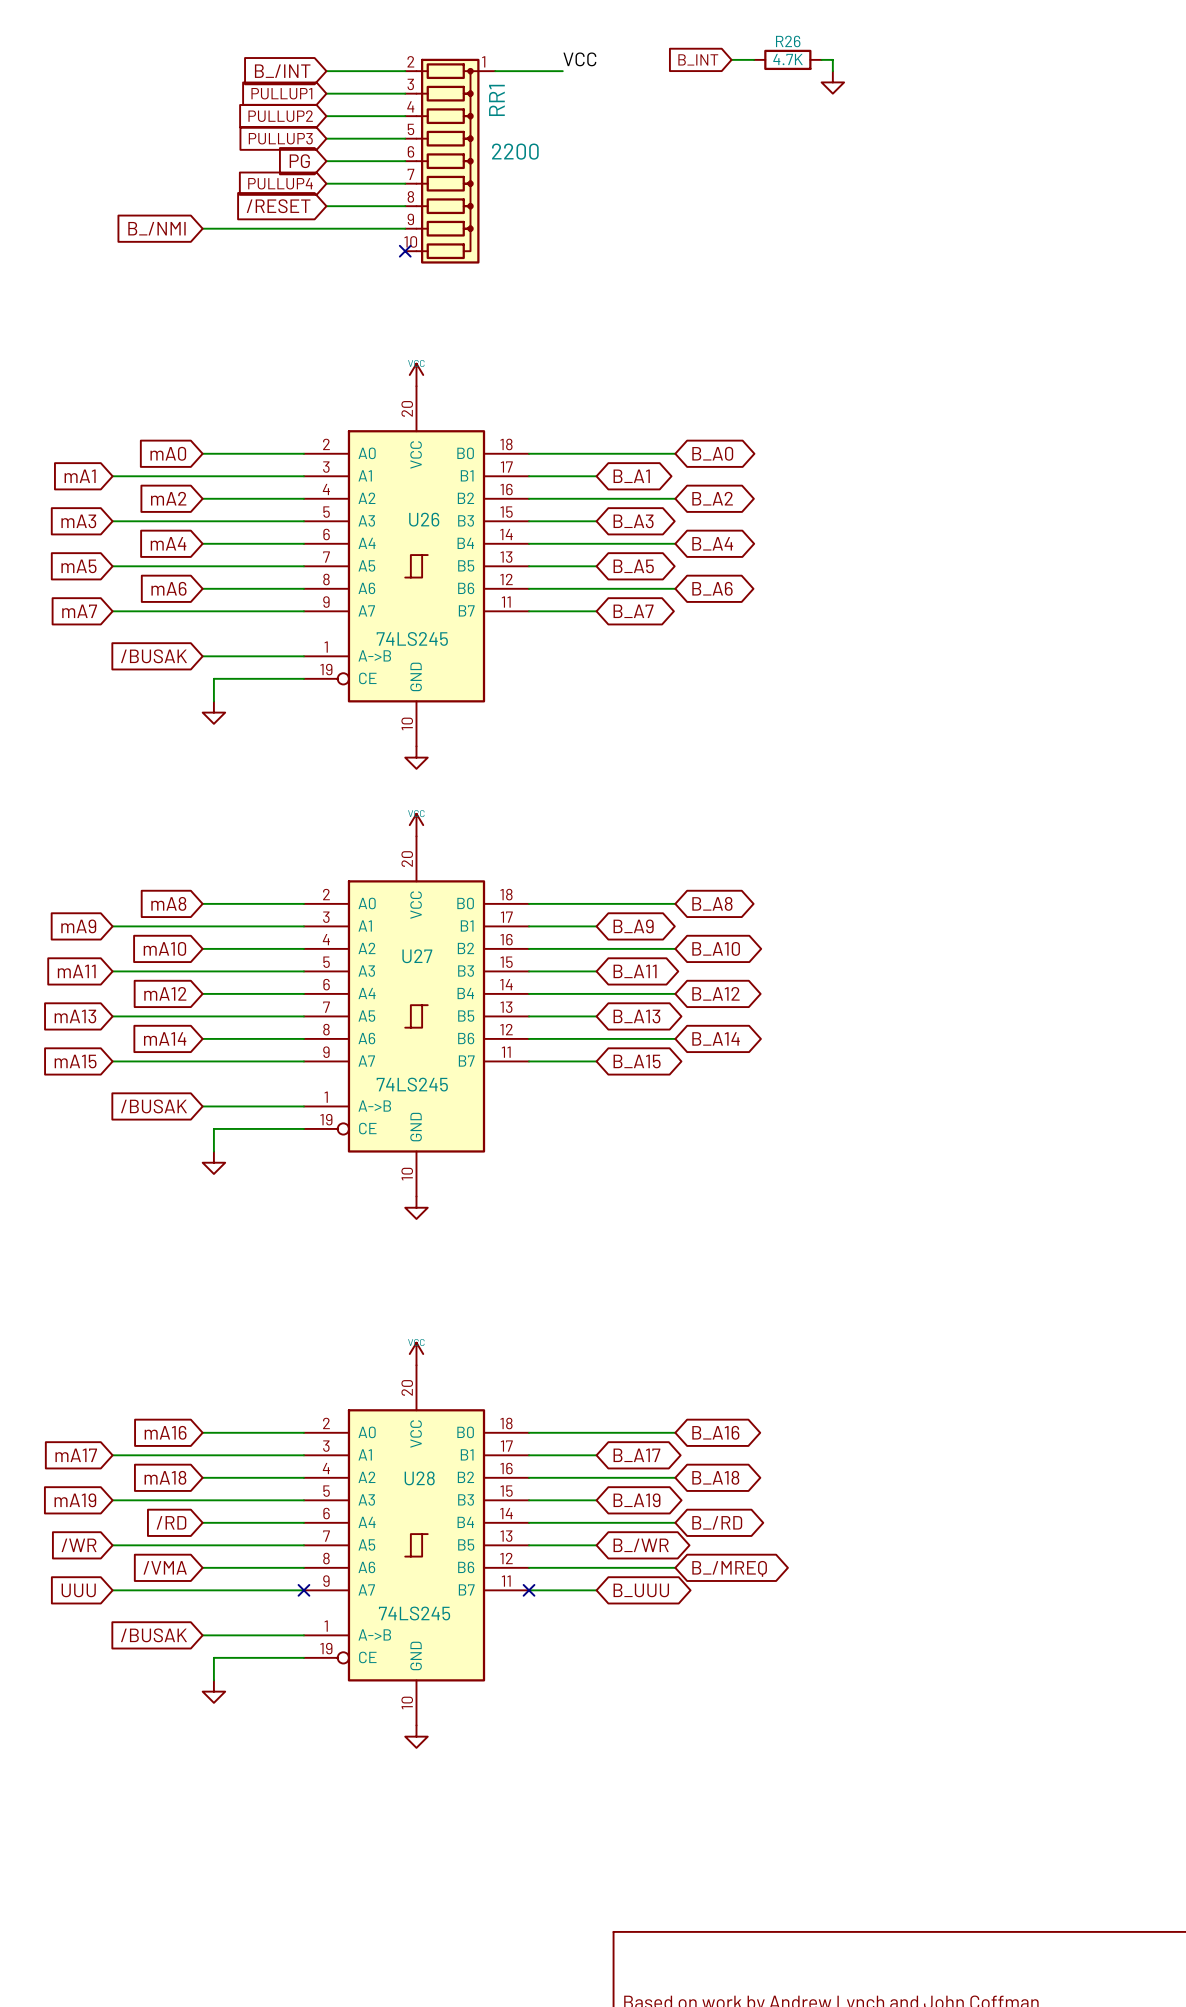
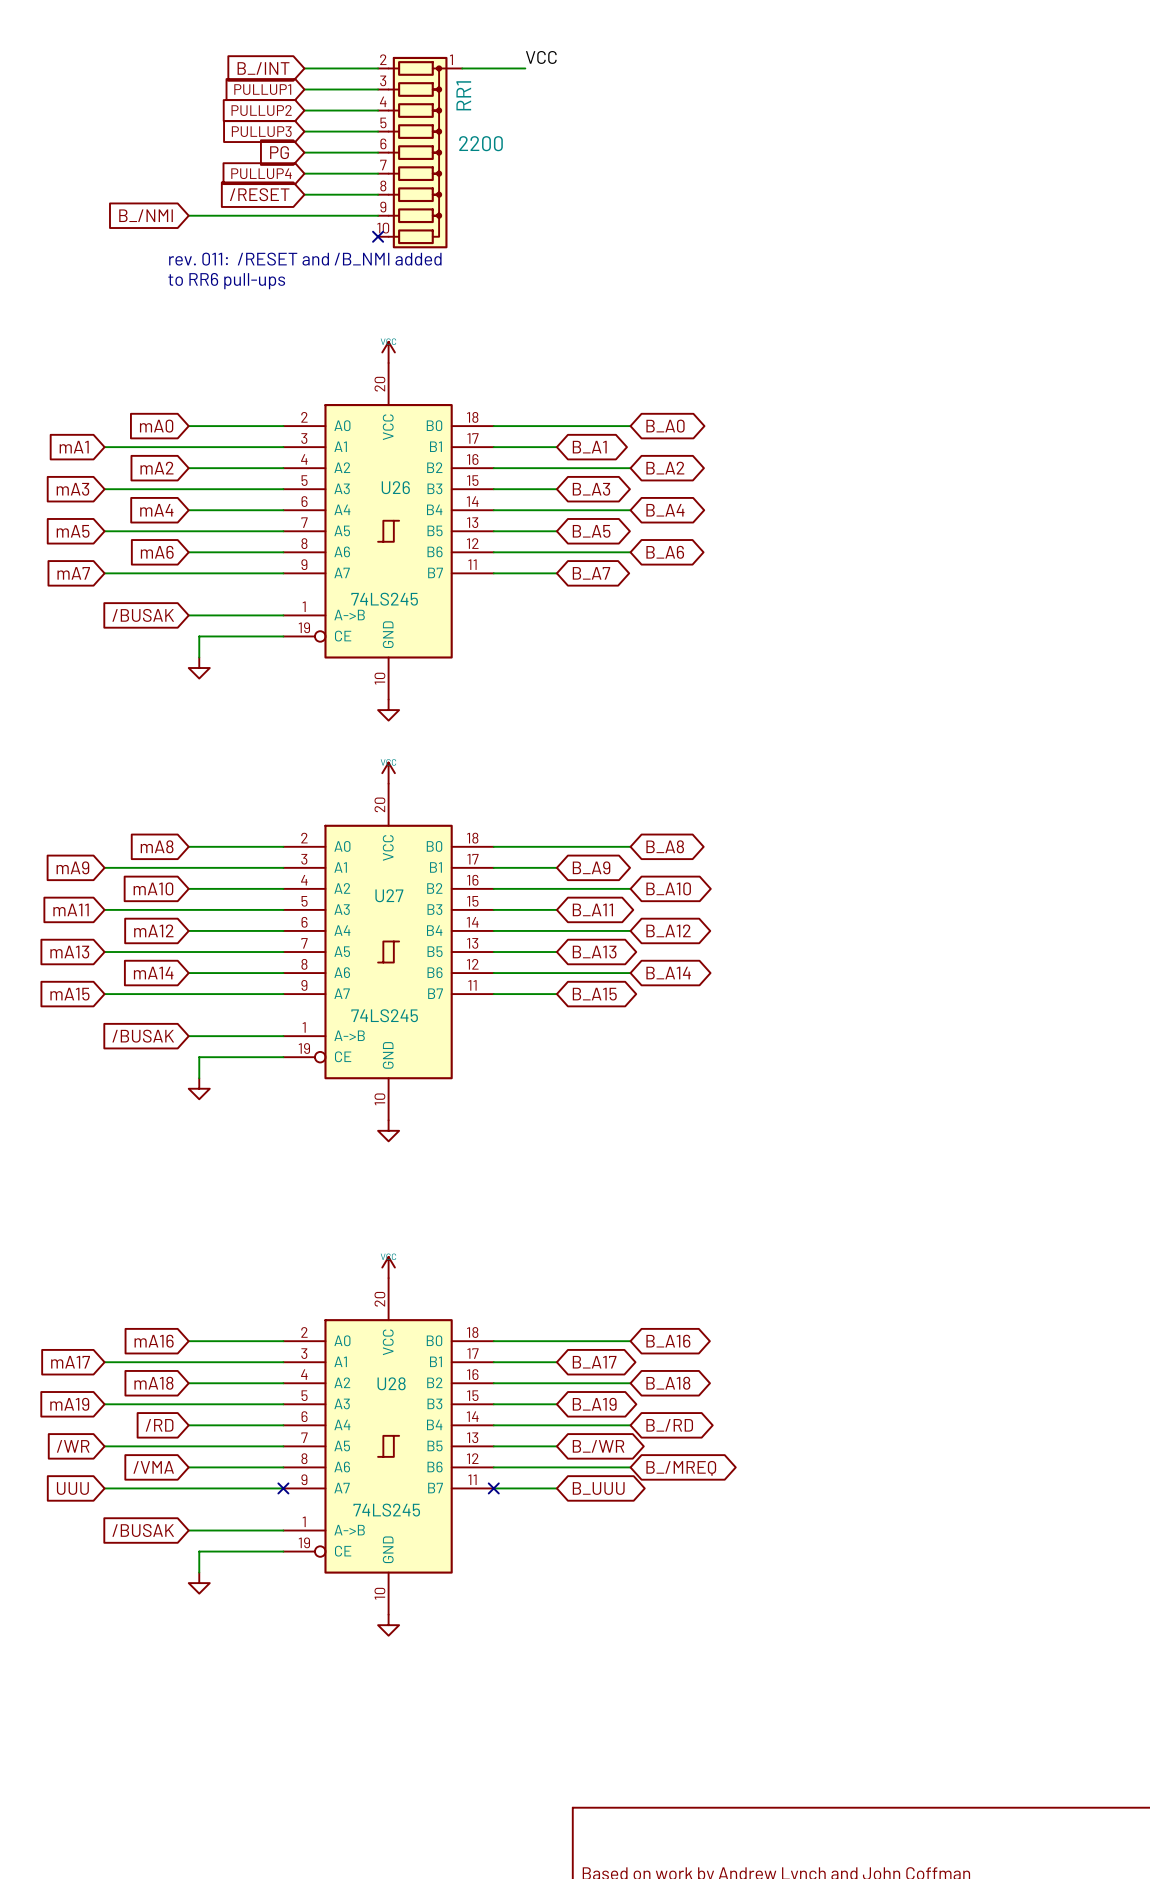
global label: B_INT (698, 59) -> none
wire: (731, 59) (754, 59) -> none
R26: 4.7K (787, 59) -> none
wire: (821, 59) (832, 59) (832, 71) -> none
power symbol: (832, 82) -> none
text: none -> rev. 011: /RESET and /B_NMI added (305, 259)
text: none -> to RR6 pull-ups (226, 281)

